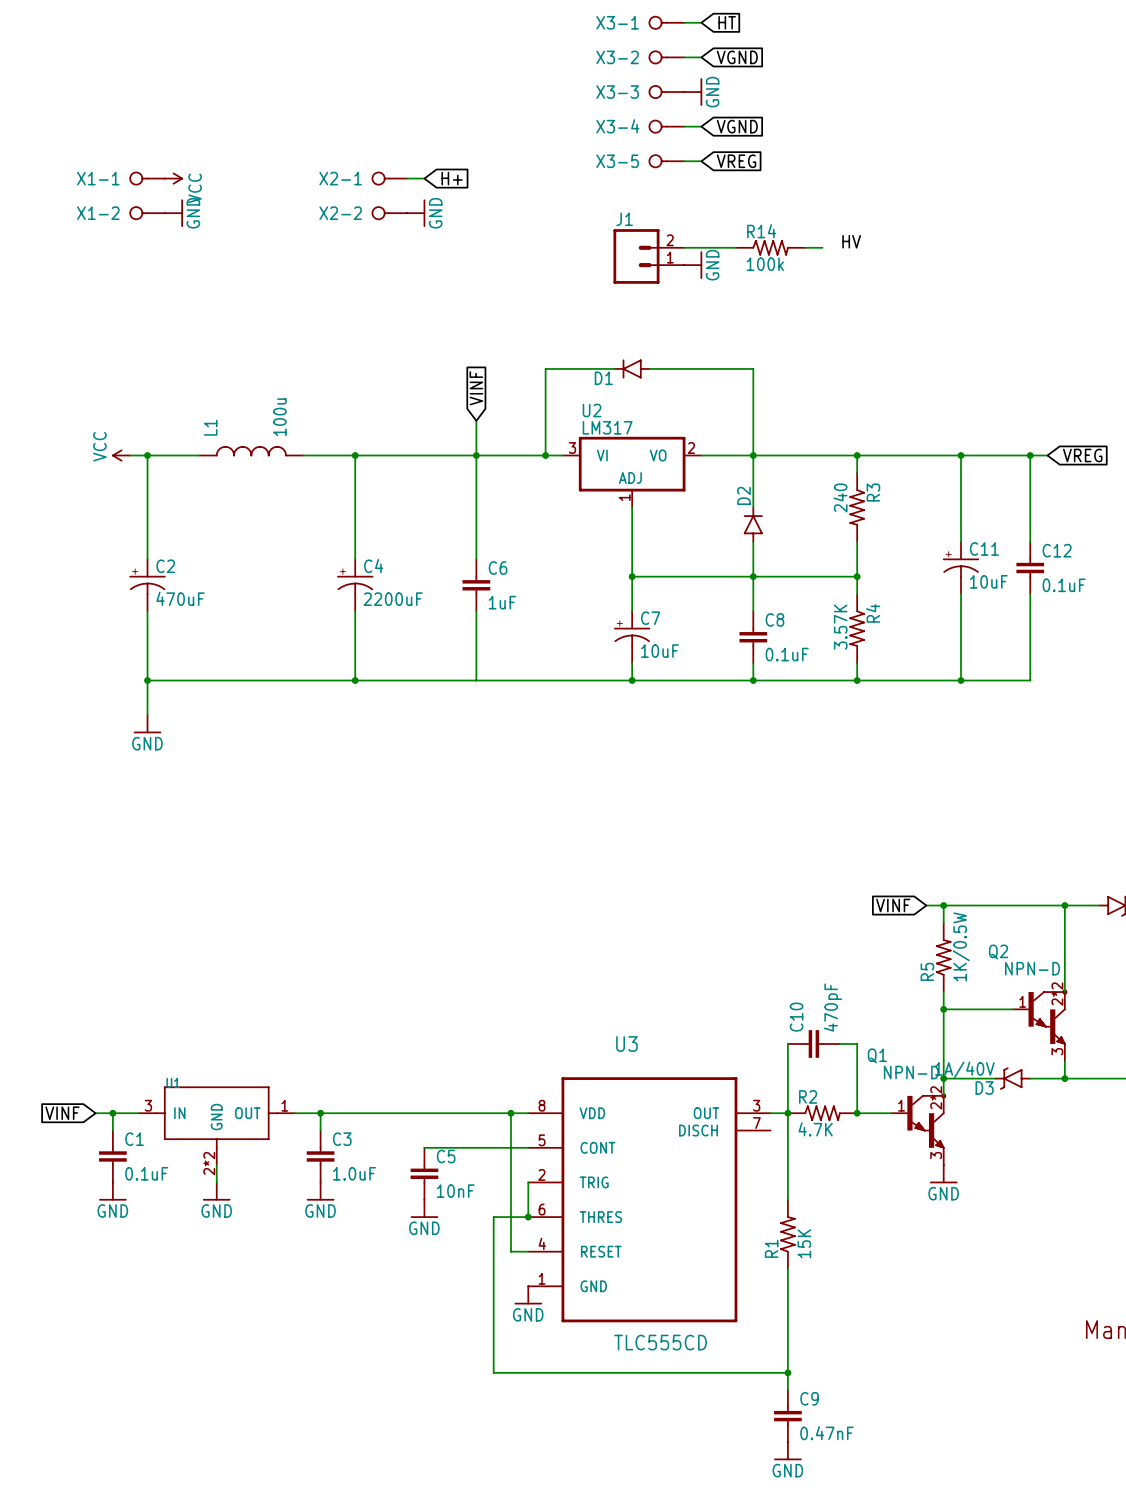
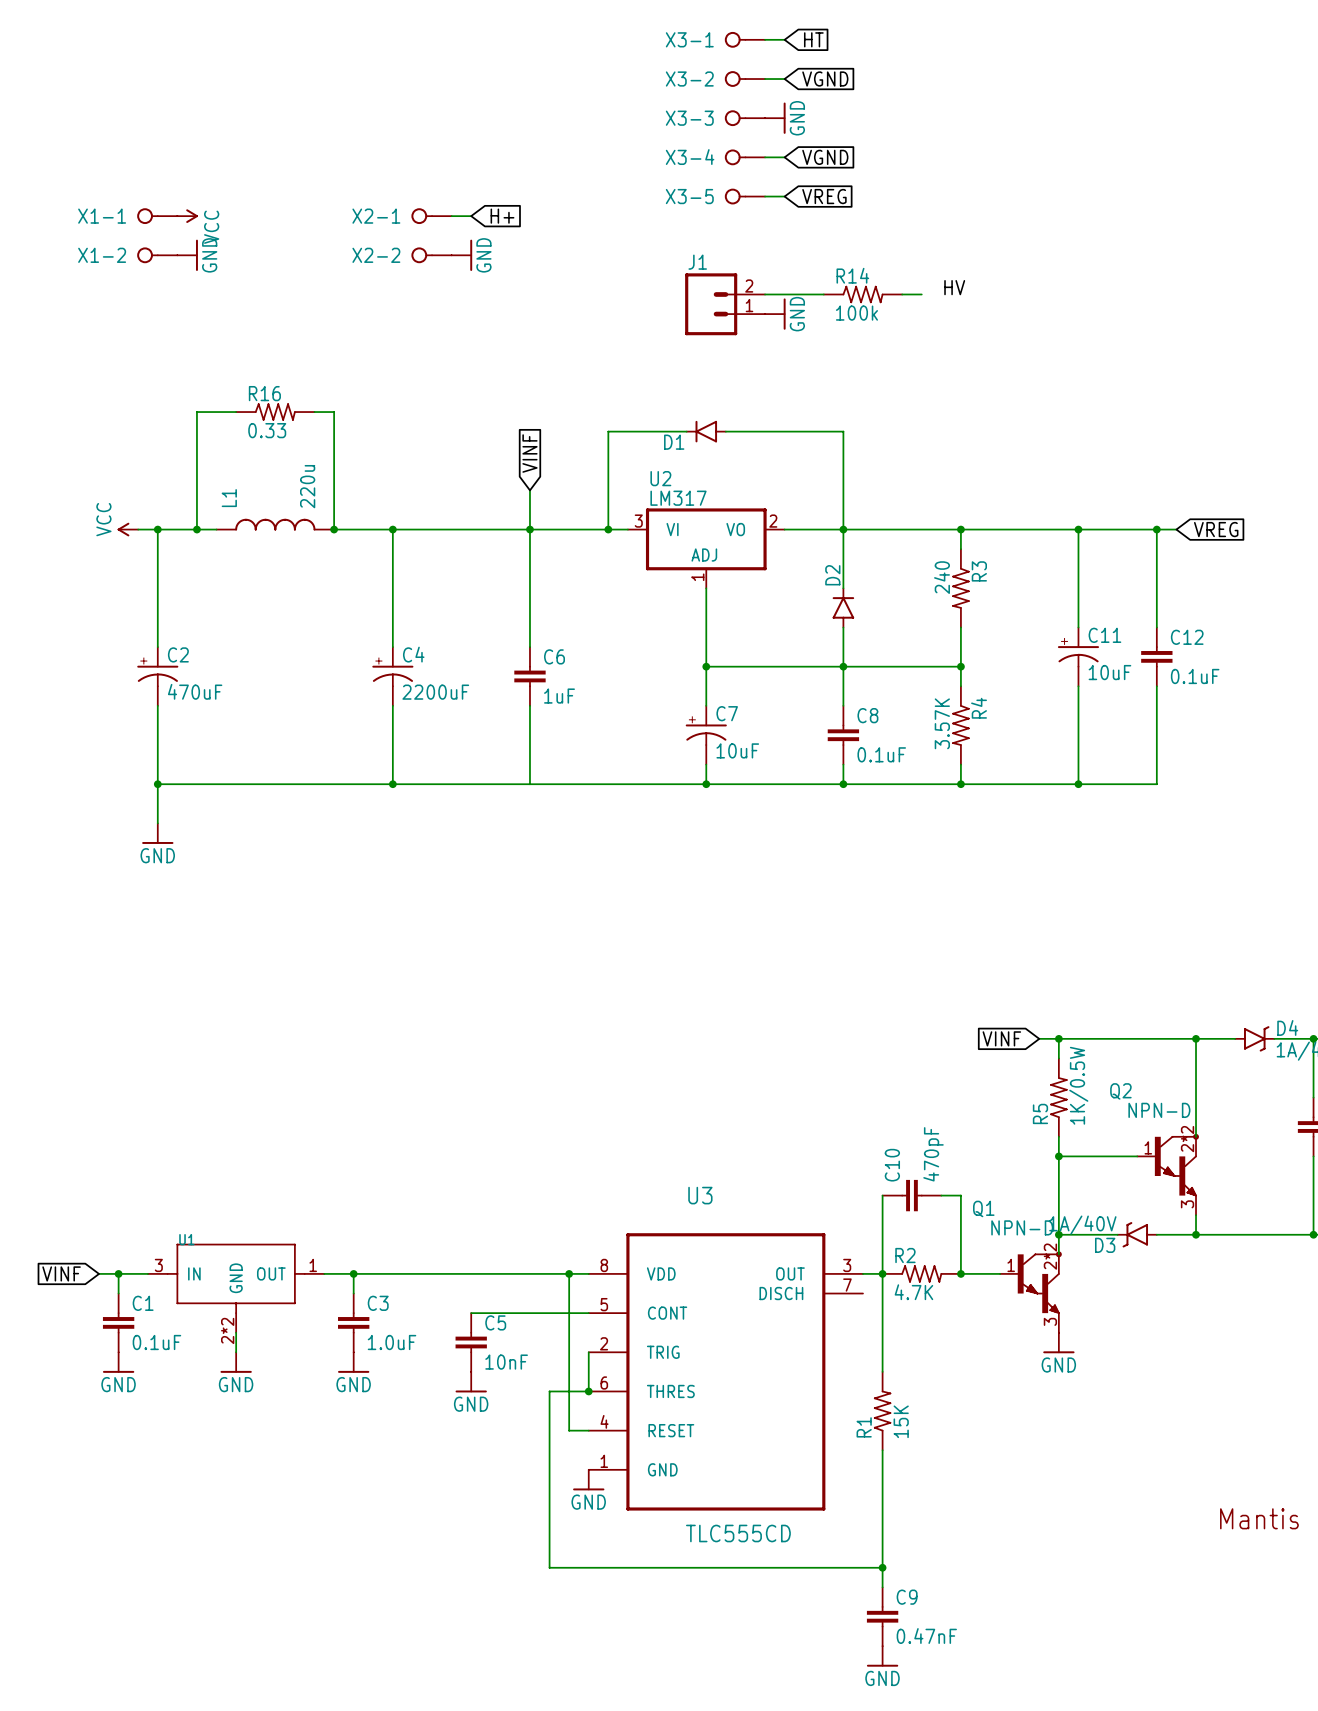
wire: none -> (236, 412) (196, 412) (196, 529)
R16: none -> 0.33 (275, 412)
wire: none -> (314, 412) (334, 412) (334, 529)
L1 value: 100u (279, 417) -> 220u (307, 486)
junction: none -> (196, 529)
junction: none -> (334, 529)

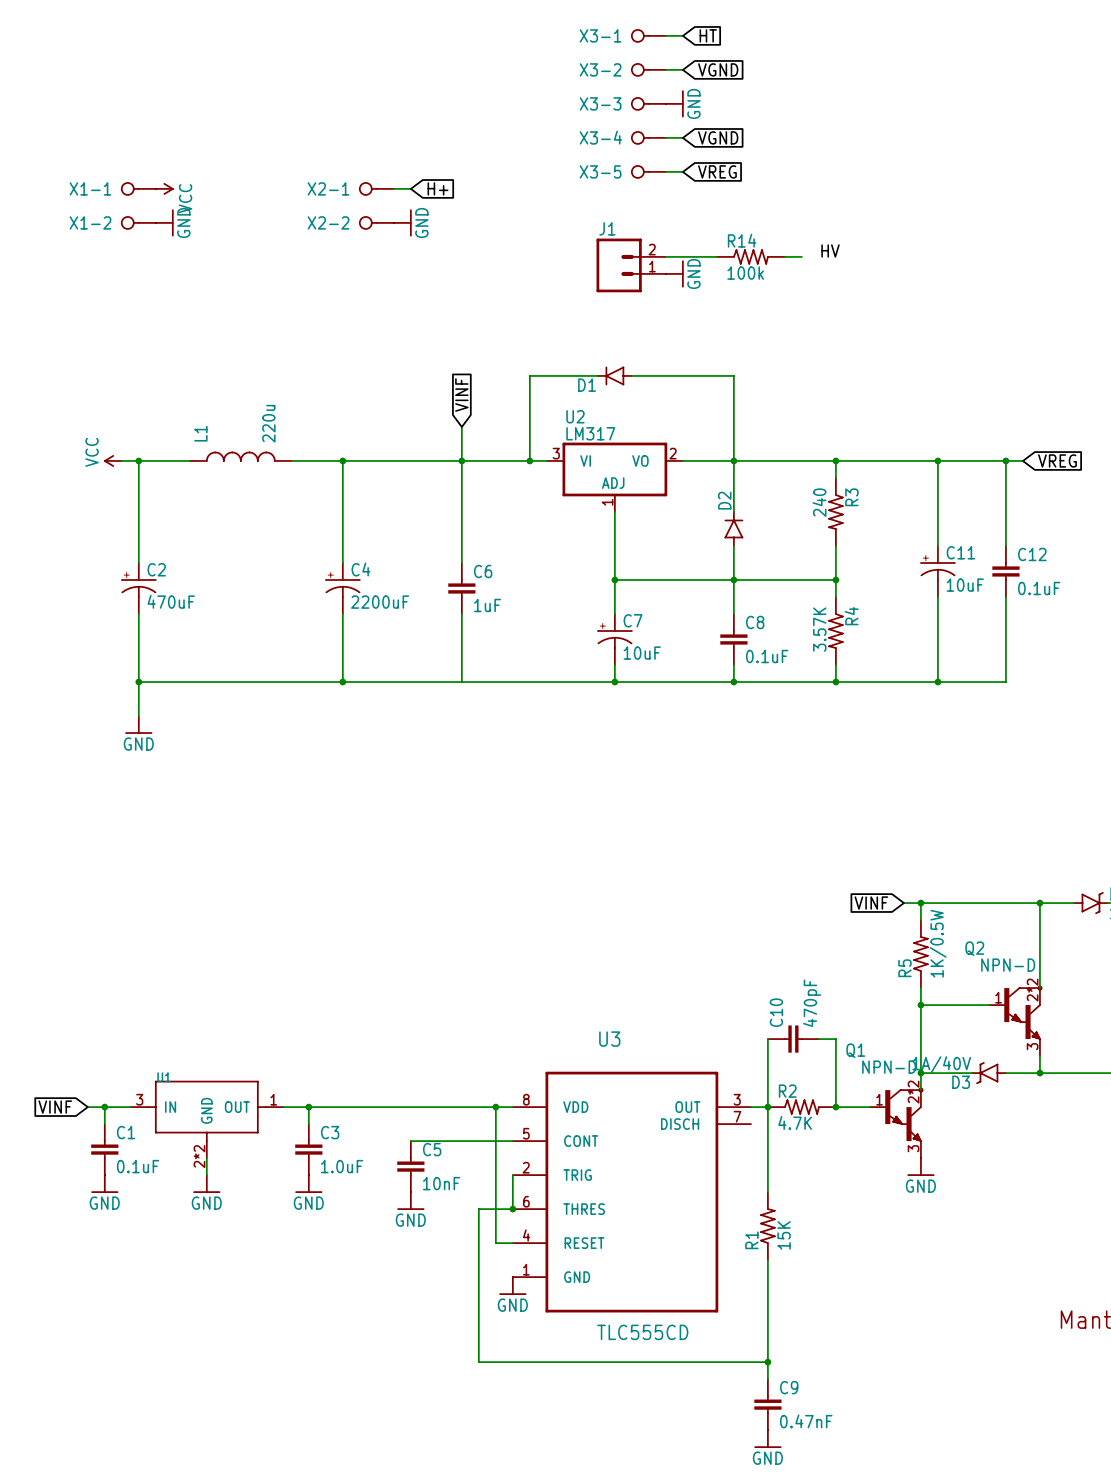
wire: (236, 412) (196, 412) (196, 529) -> none
R16: 0.33 (275, 412) -> none
wire: (314, 412) (334, 412) (334, 529) -> none
junction: (196, 529) -> none
junction: (334, 529) -> none

